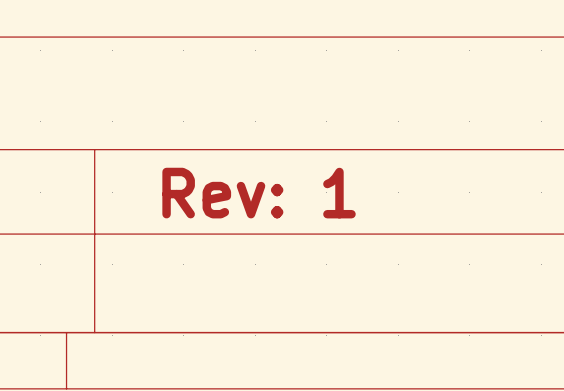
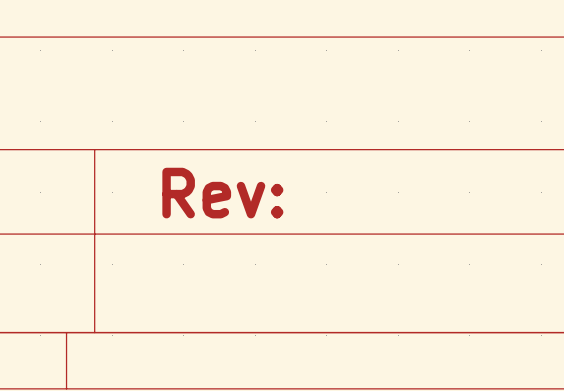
title block: Rev: 1 (259, 193) -> Rev: (222, 193)

